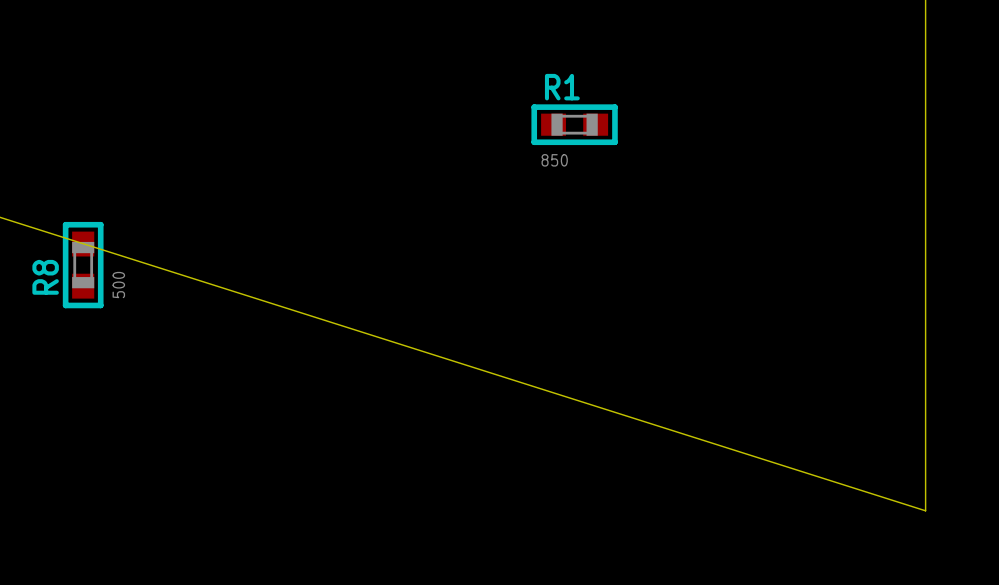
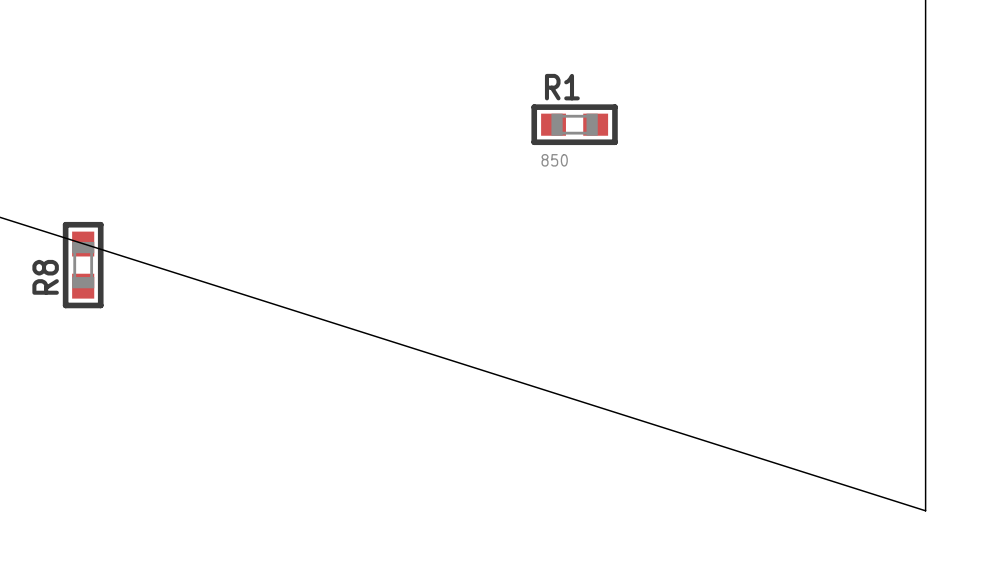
R8 value: 500 (118, 285) -> none

